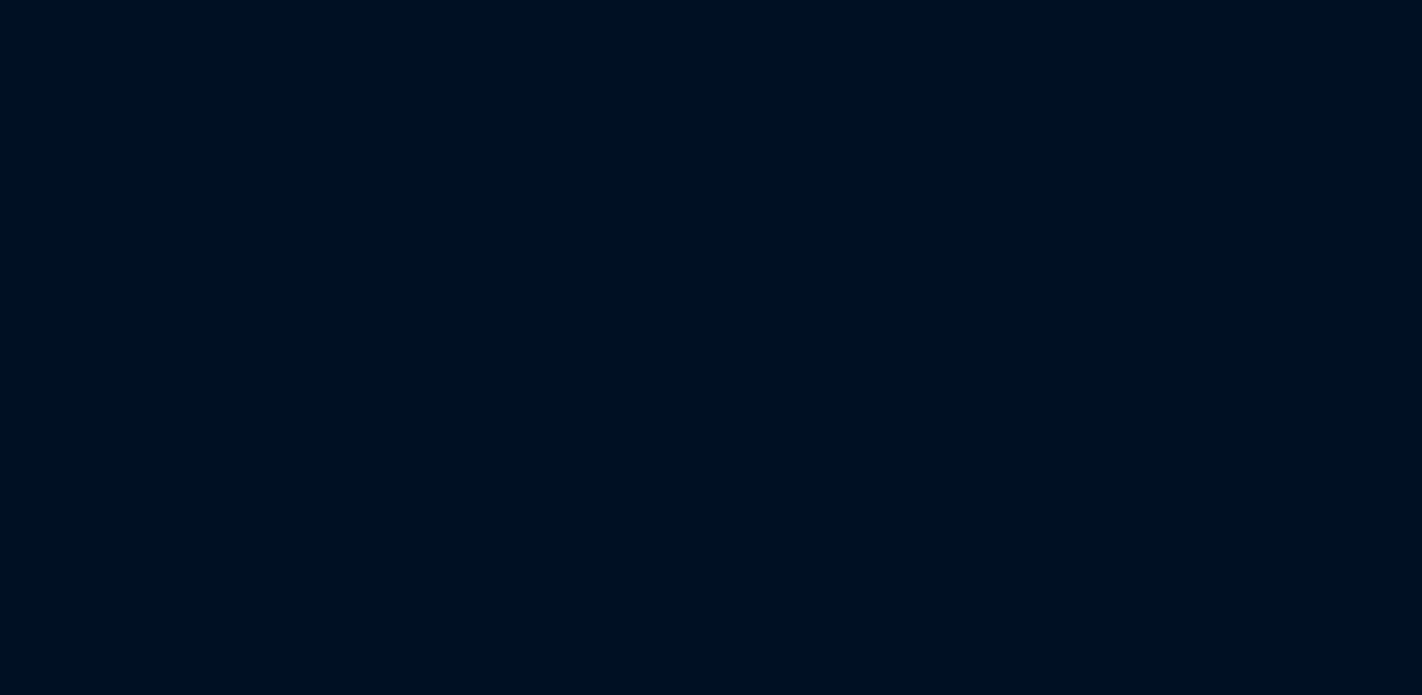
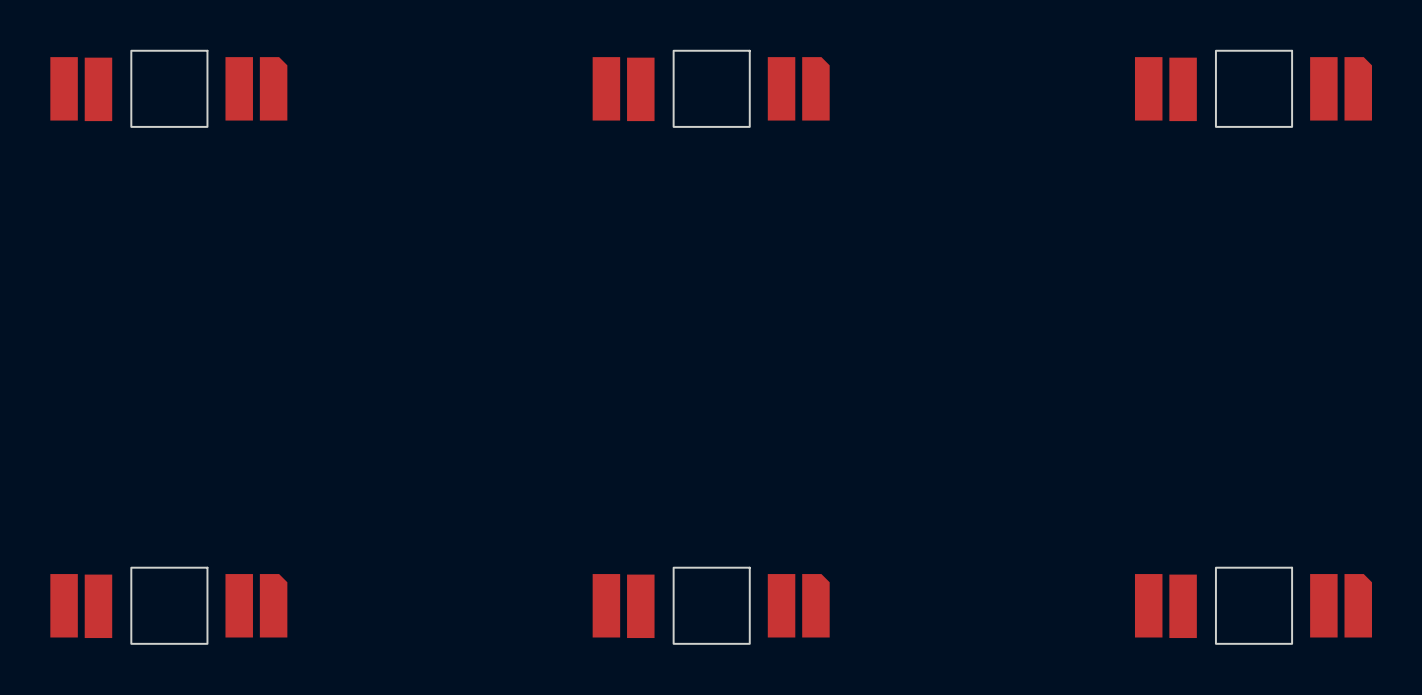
part: none -> (168, 88)
part: none -> (711, 88)
part: none -> (1253, 88)
part: none -> (168, 605)
part: none -> (711, 605)
part: none -> (1253, 605)

